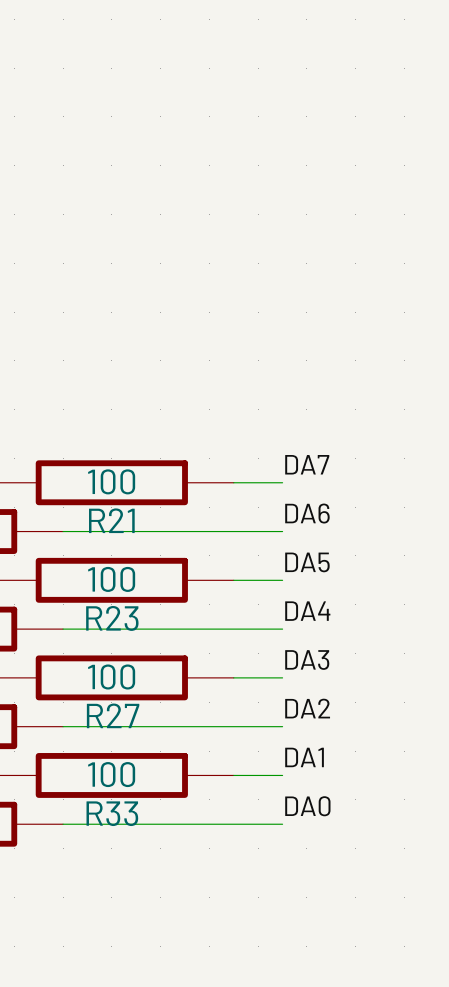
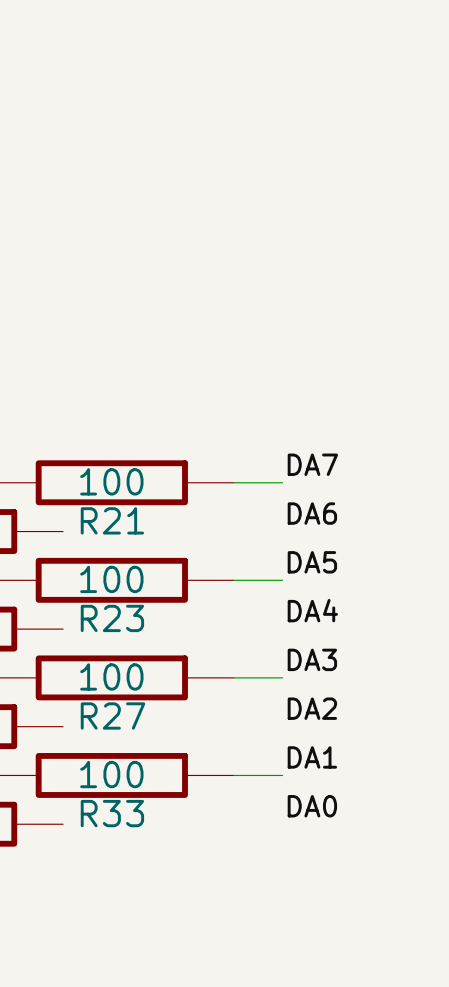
wire: (63, 531) (282, 531) -> none
wire: (63, 629) (282, 629) -> none
wire: (63, 726) (282, 726) -> none
wire: (63, 824) (282, 824) -> none

